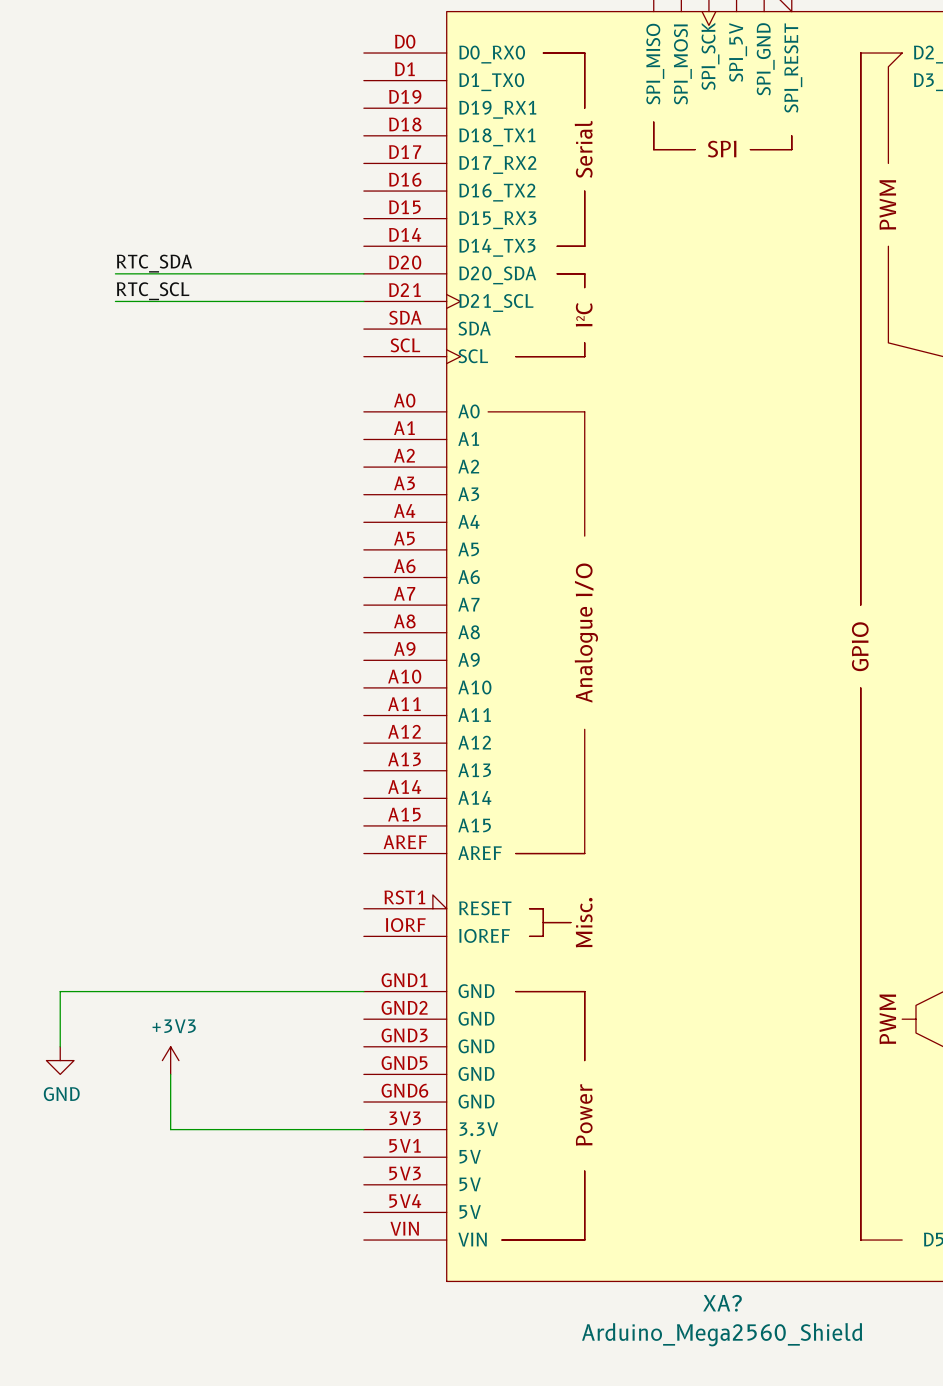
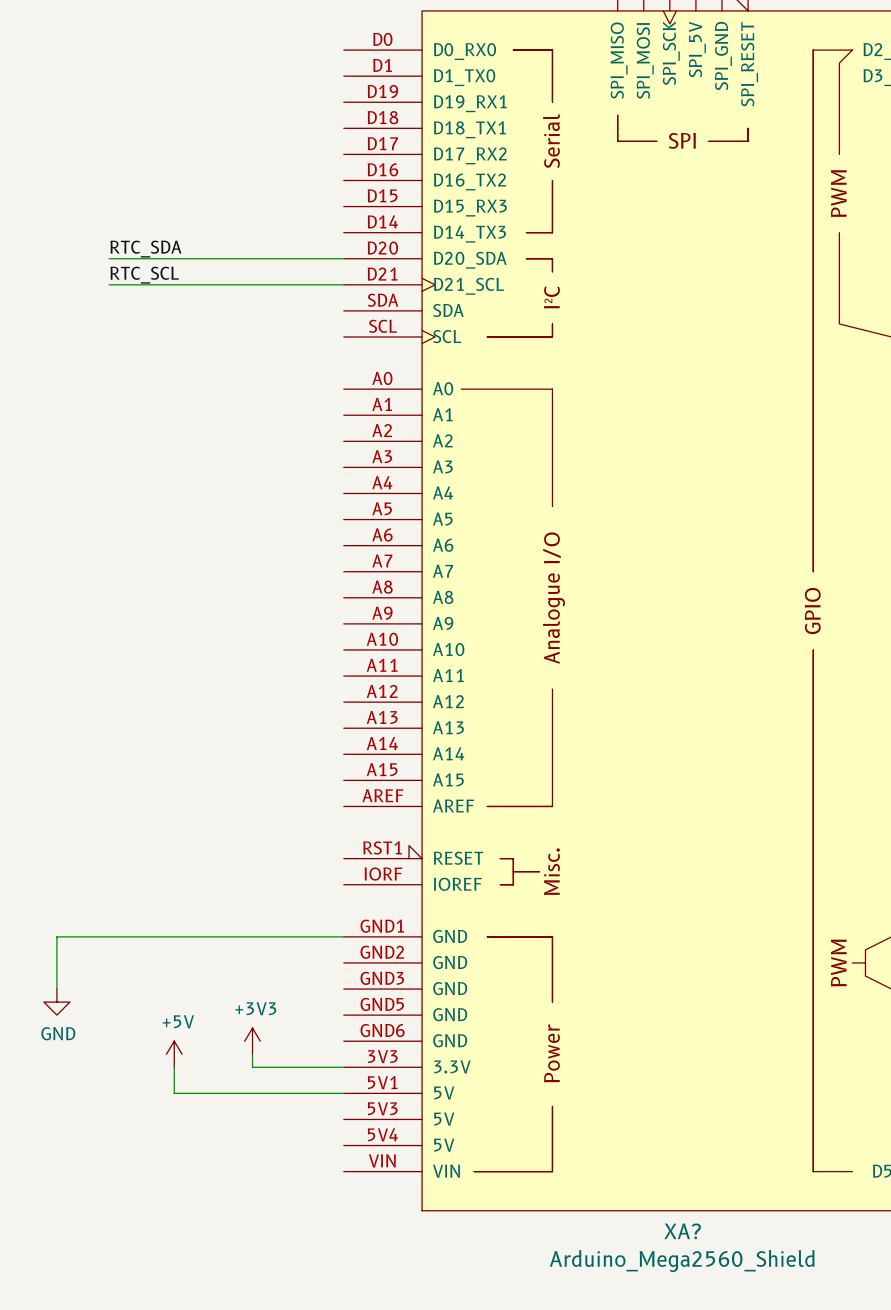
power symbol position: +3V3 (170, 1060) -> +3V3 (252, 1041)
wire: (170, 1074) (170, 1129) (267, 1129) -> (252, 1054) (252, 1067)
power symbol: none -> +5V (174, 1054)
wire: none -> (174, 1067) (174, 1093) (343, 1093)

